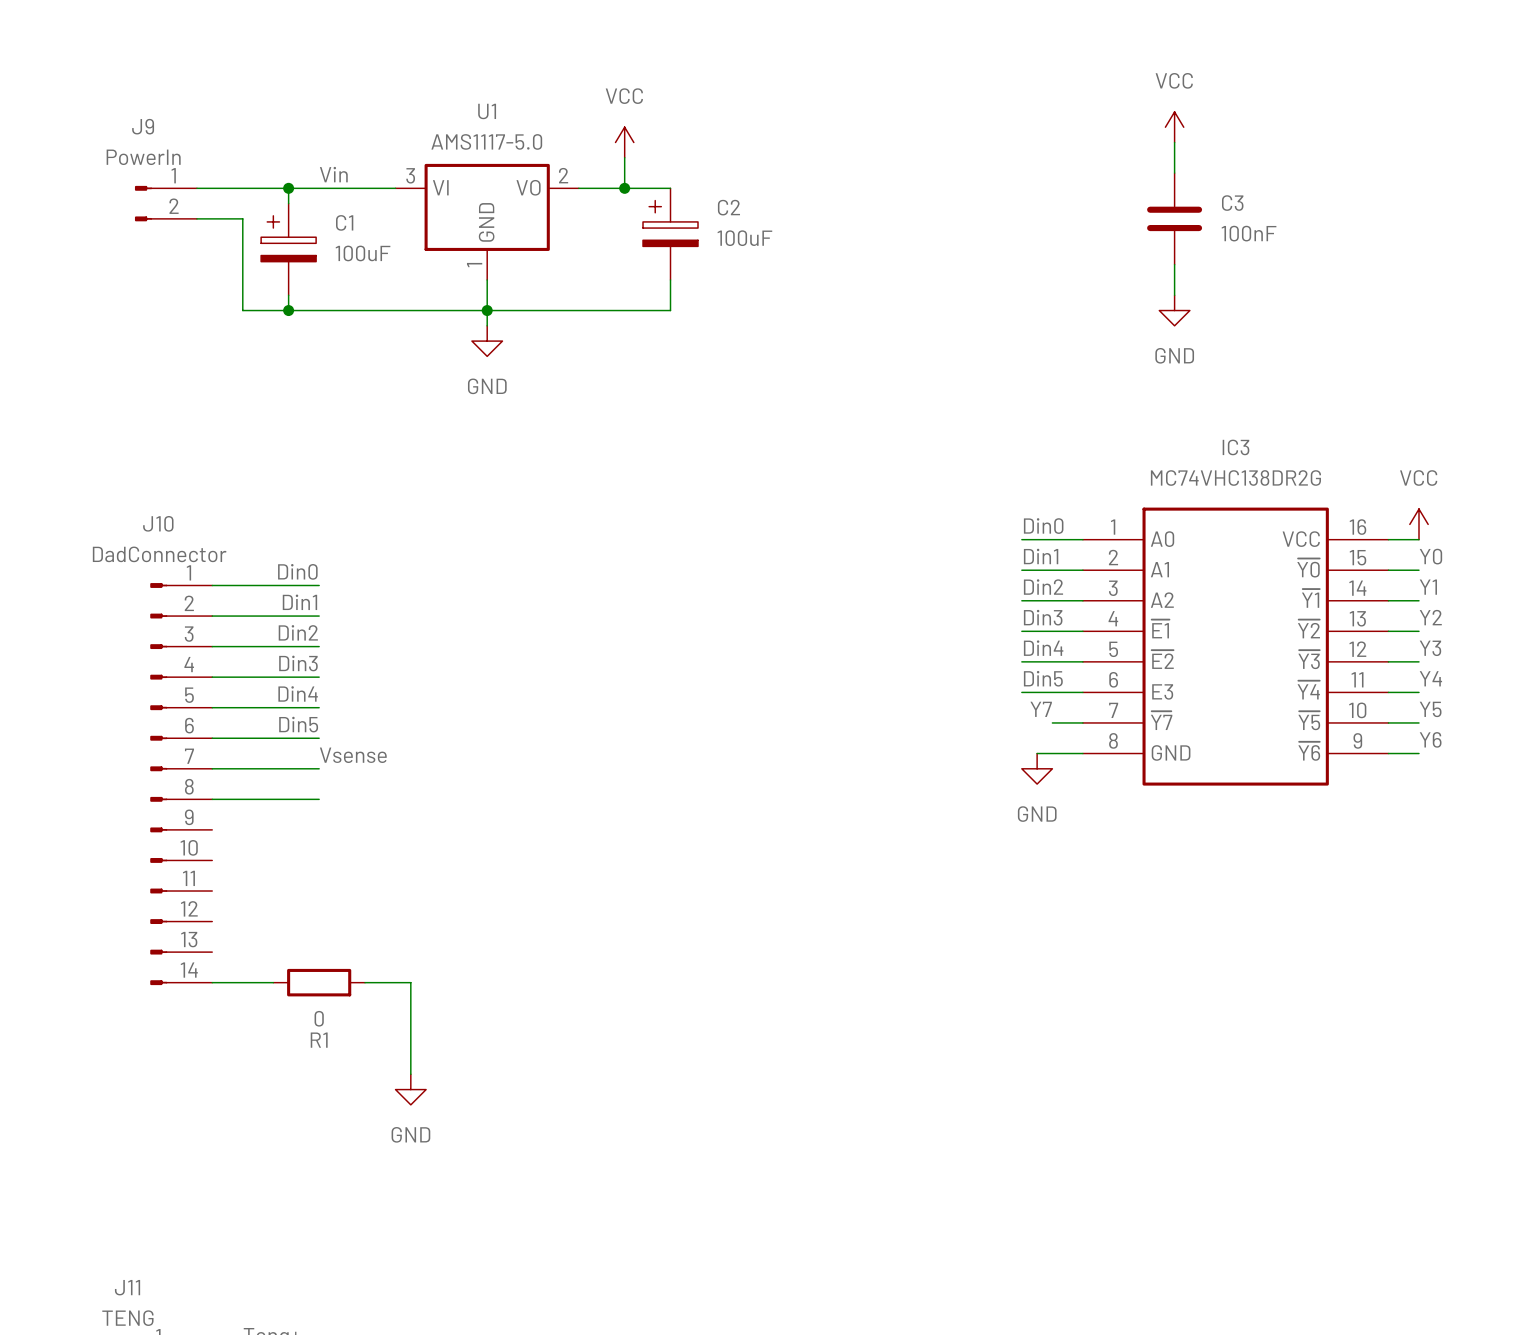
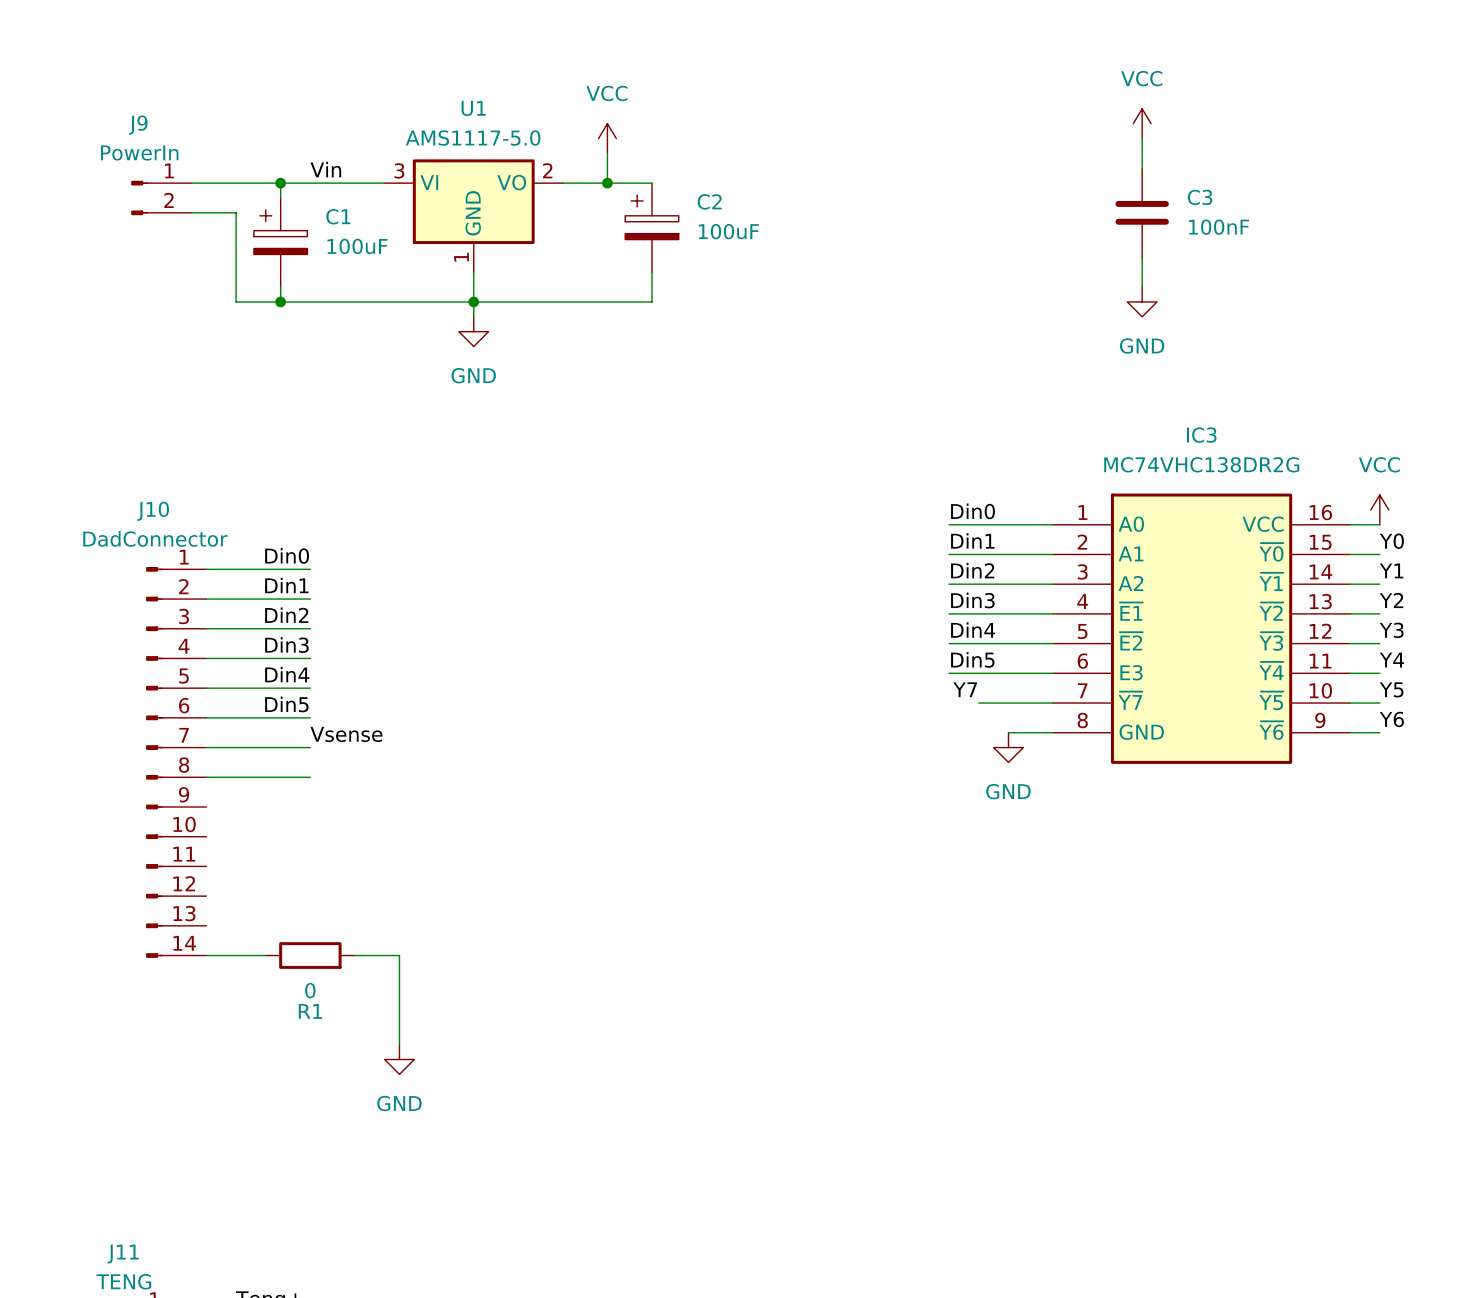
label position: Din0 (1043, 526) -> Din0 (973, 511)
wire: none -> (949, 524) (993, 524)
label position: Din1 (1041, 556) -> Din1 (972, 540)
wire: none -> (949, 554) (993, 554)
label position: Din2 (1043, 587) -> Din2 (972, 570)
wire: none -> (949, 584) (993, 584)
label position: Din3 (1043, 617) -> Din3 (972, 600)
wire: none -> (949, 613) (993, 613)
label position: Din4 (1043, 648) -> Din4 (973, 630)
wire: none -> (949, 643) (993, 643)
label position: Din5 (1043, 678) -> Din5 (972, 659)
wire: none -> (949, 673) (993, 673)
label position: Y7 (1041, 709) -> Y7 (965, 689)
wire: none -> (978, 703) (1023, 703)

